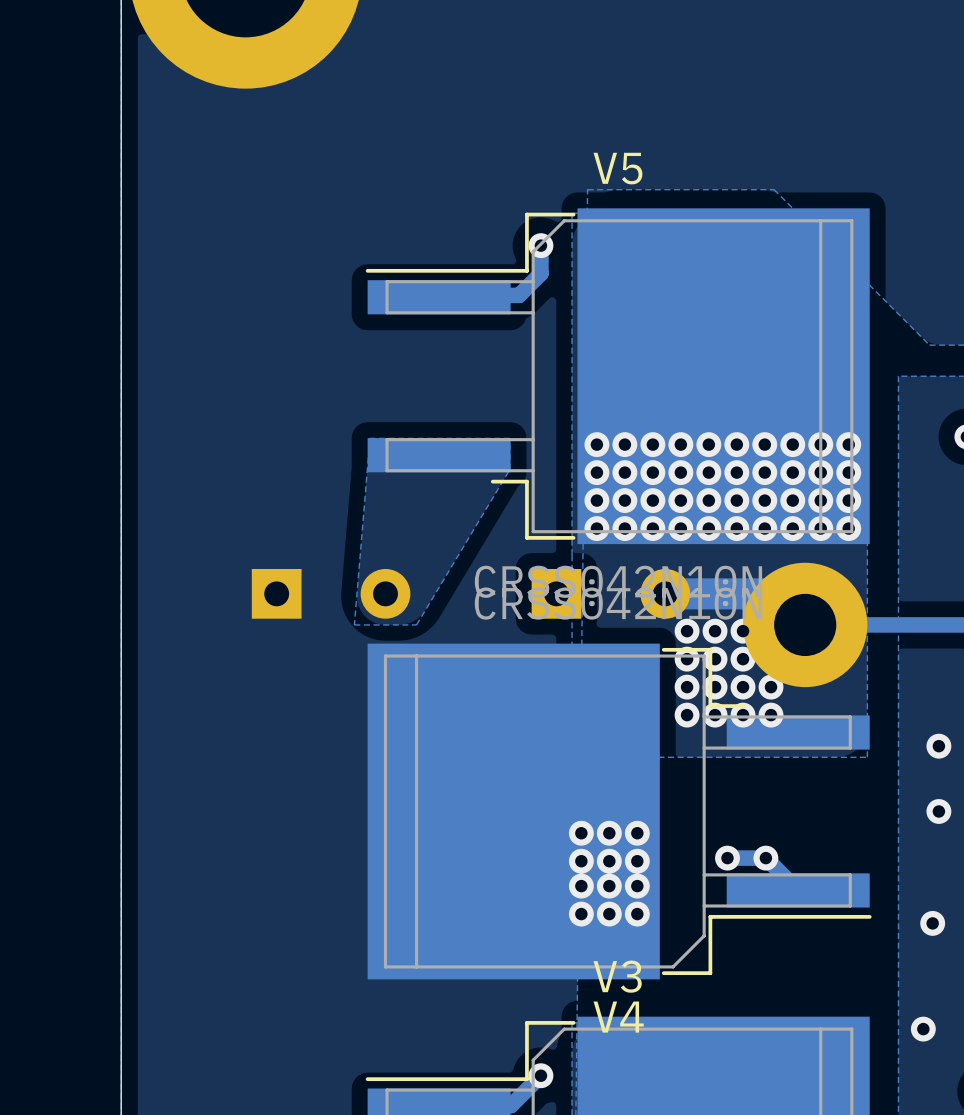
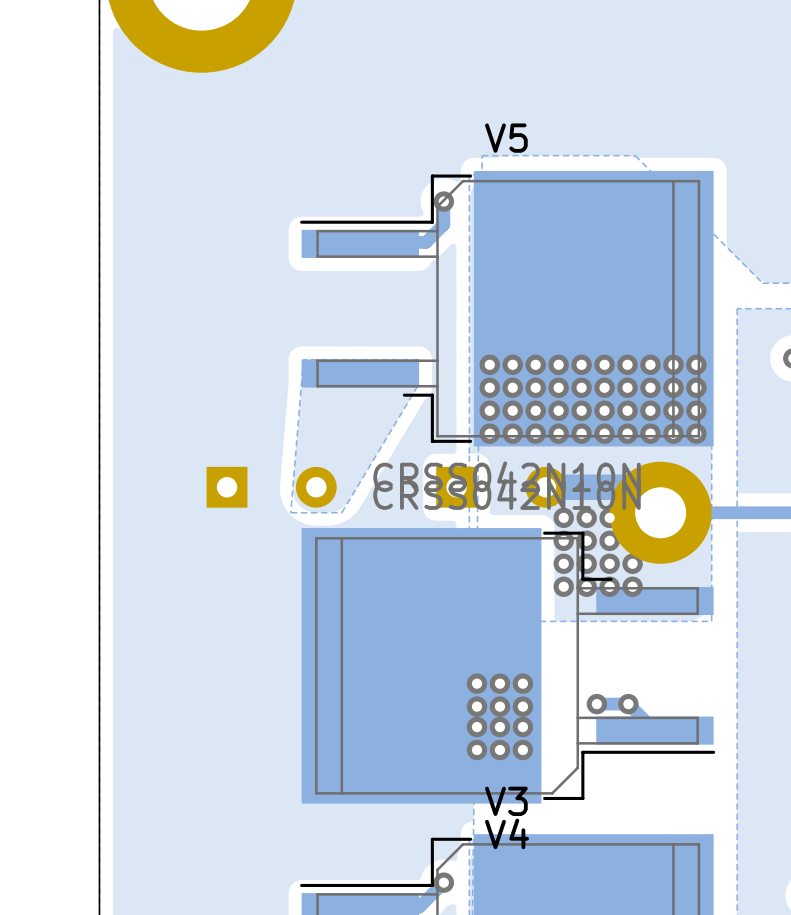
via: (938, 746) -> none
via: (938, 811) -> none
via: (932, 923) -> none
via: (923, 1029) -> none

